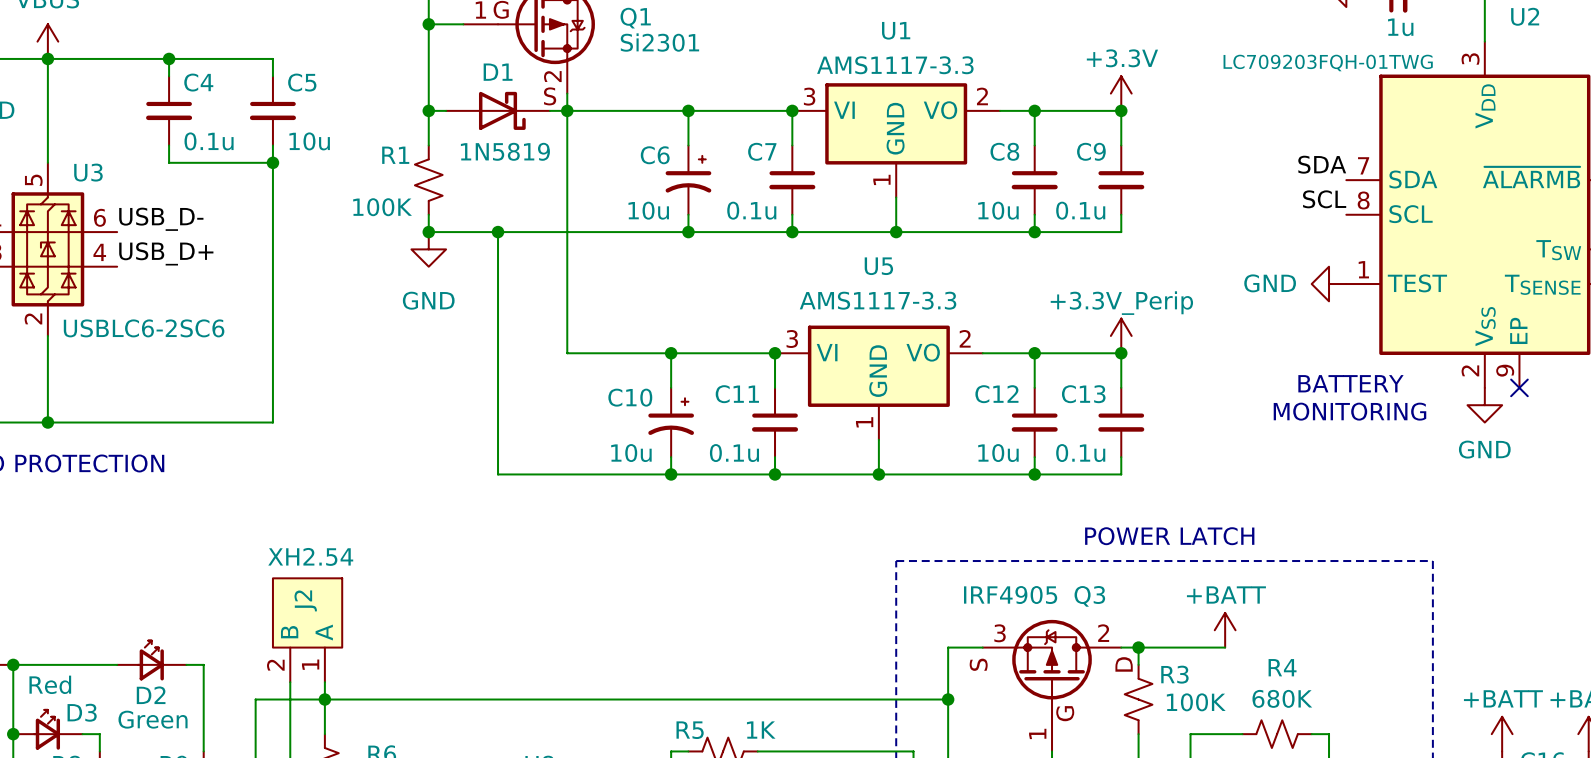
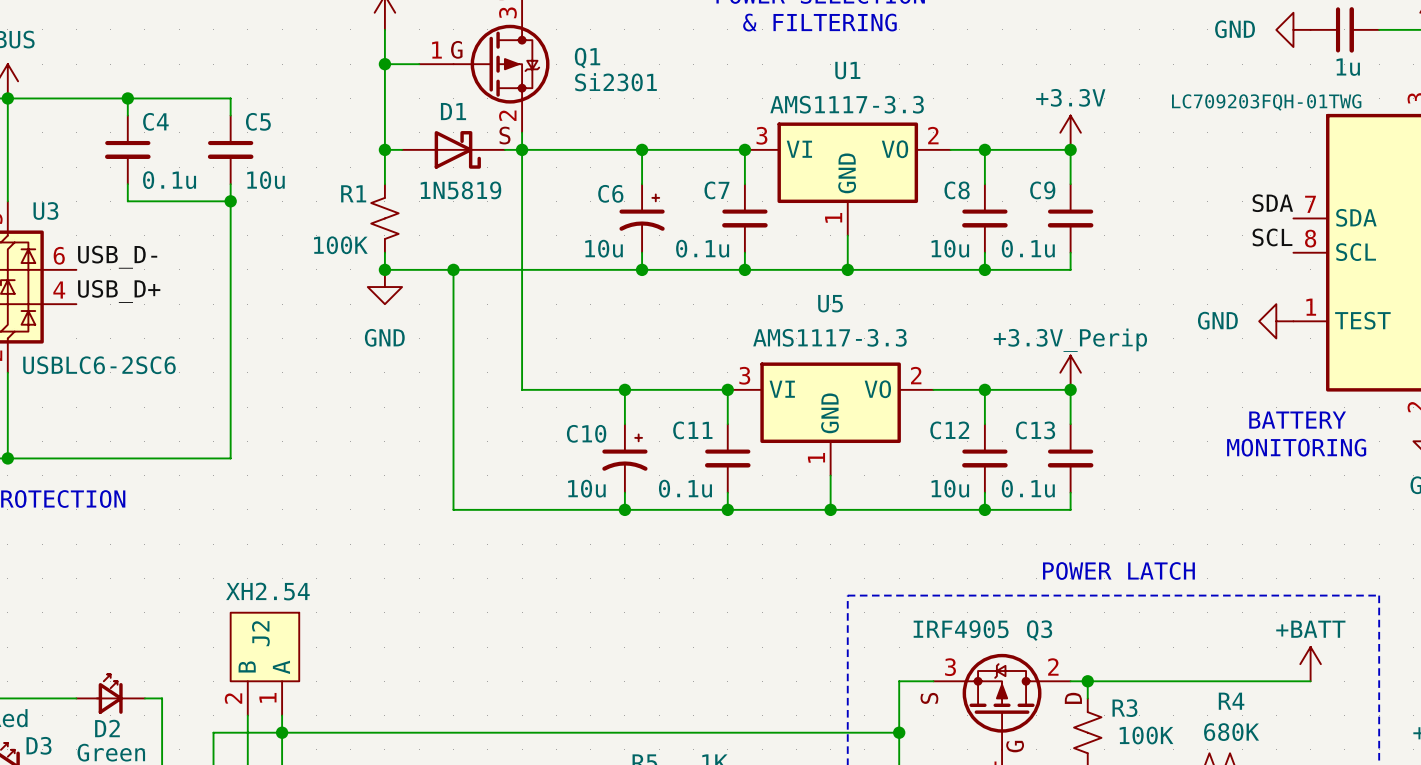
power symbol position: +BATT (1225, 630) -> +BATT (1310, 664)
wire: none -> (1173, 681) (1310, 681)

